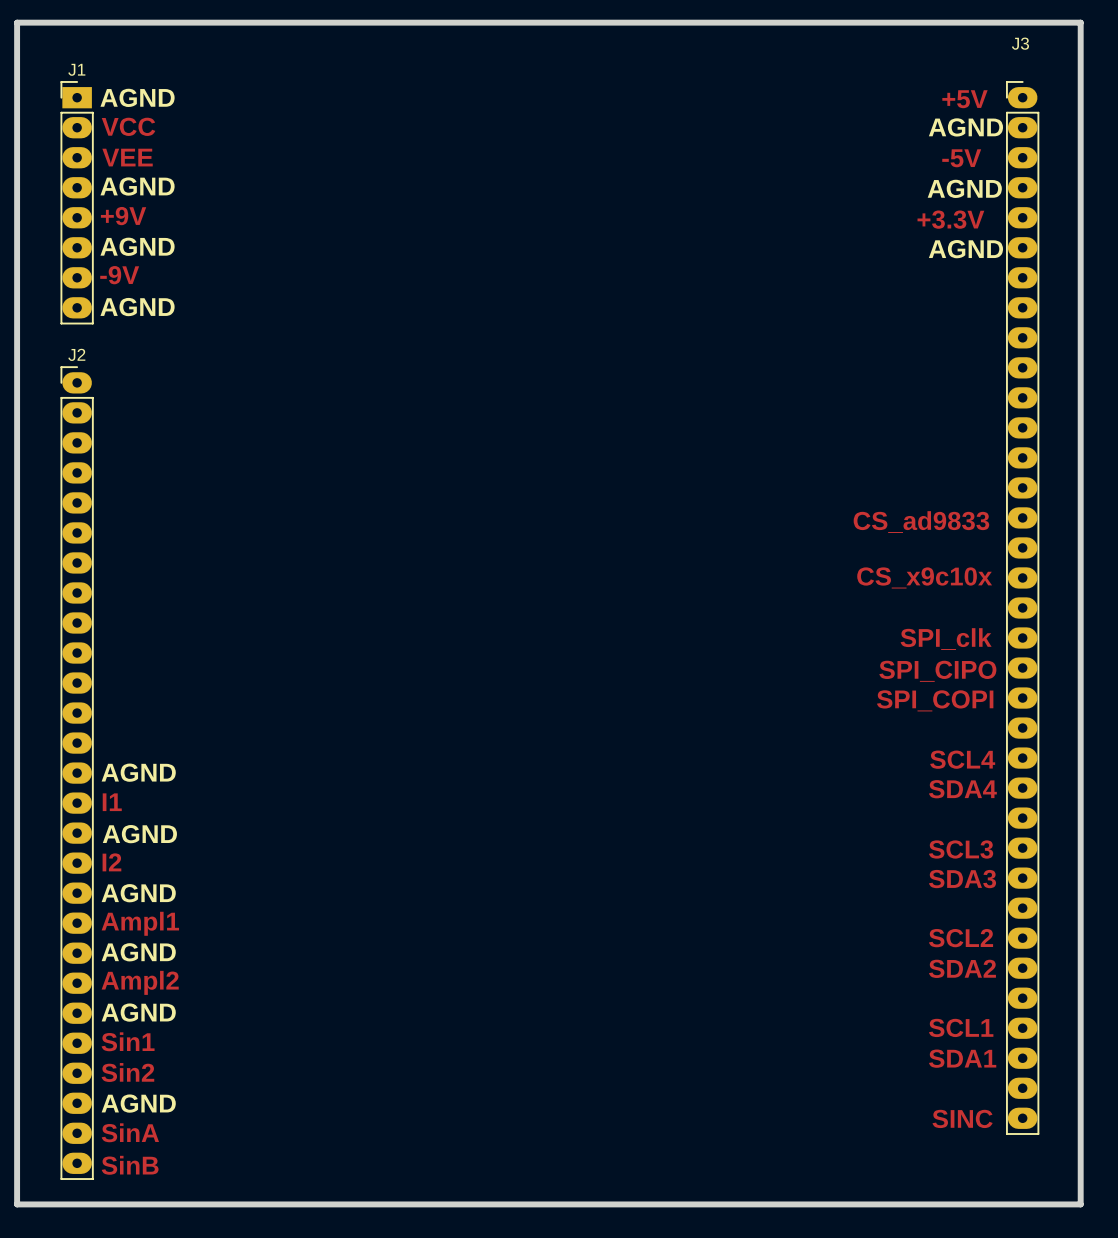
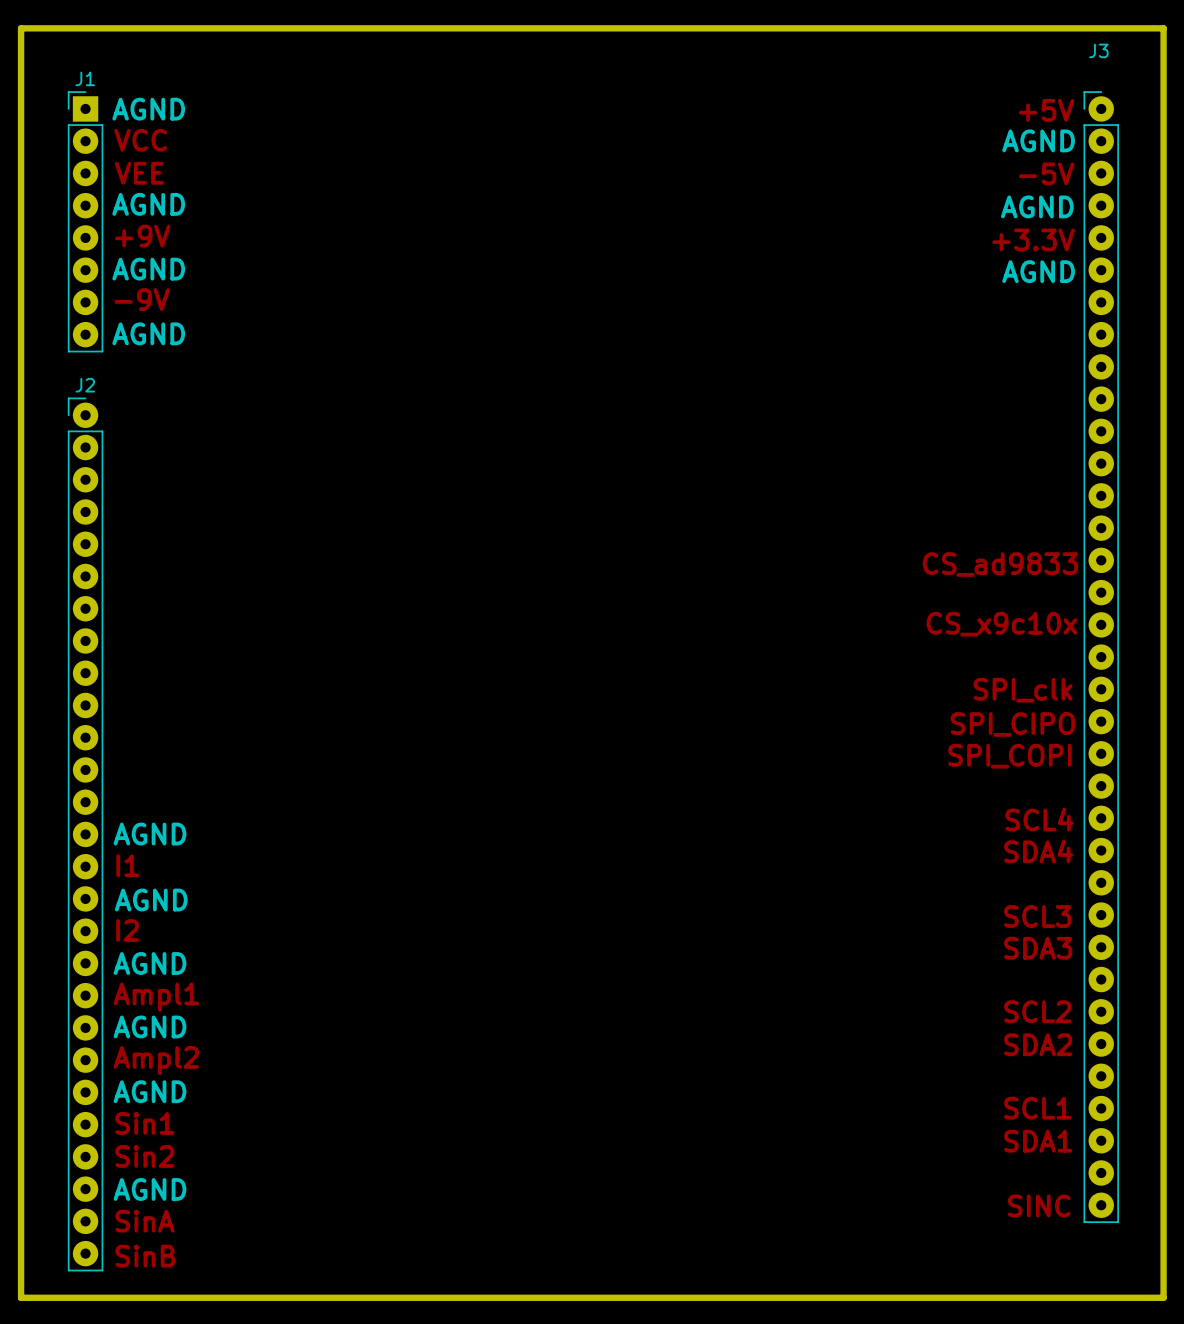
J1 footprint: [60, 81, 94, 325] -> [67, 91, 104, 353]
J3 footprint: [1006, 81, 1040, 1135] -> [1083, 91, 1119, 1223]
J2 footprint: [60, 366, 94, 1180] -> [67, 397, 104, 1272]

